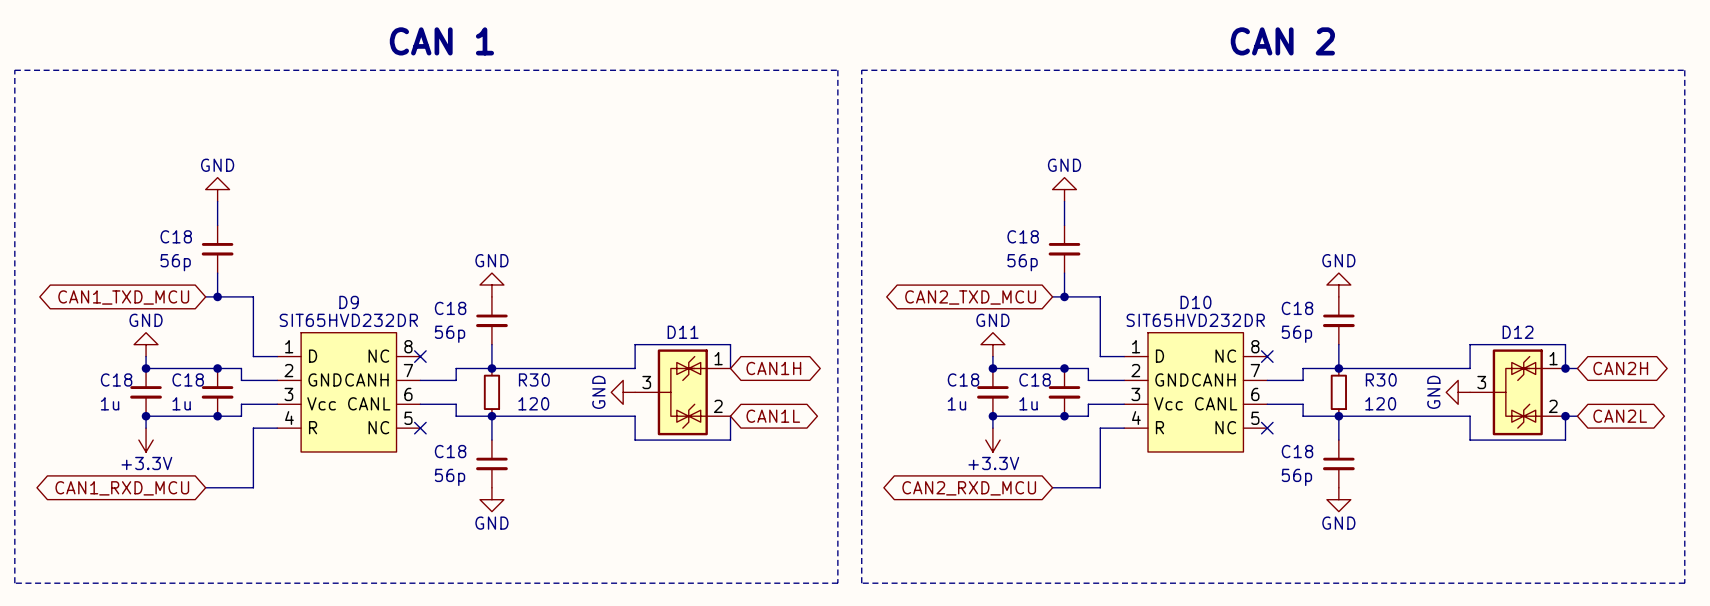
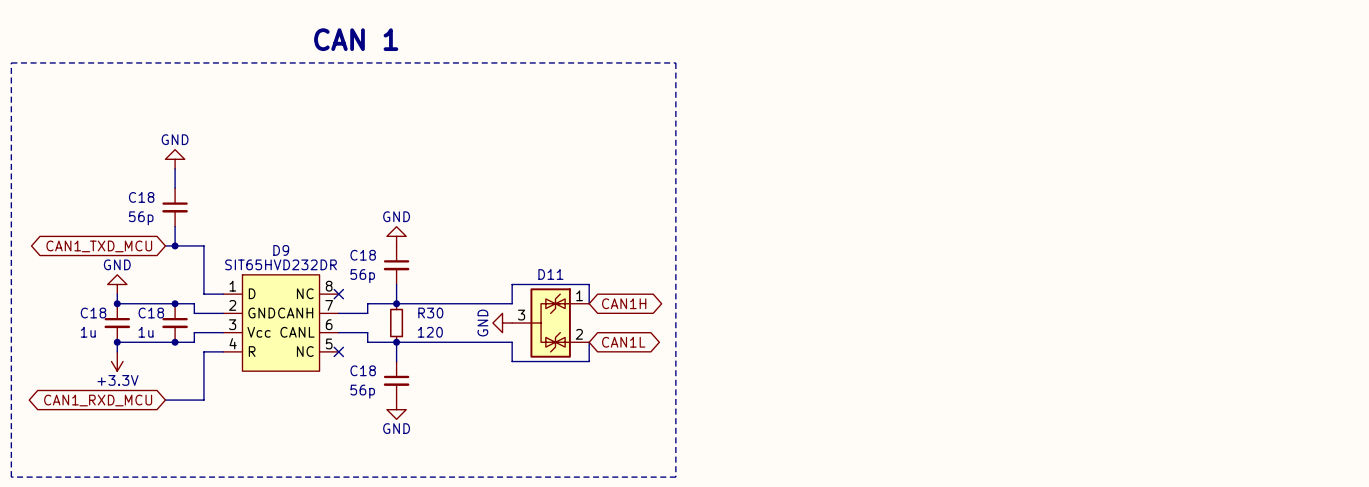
text: CAN 2 (1282, 41) -> none
line: (861, 70) (1684, 70) (1684, 583) (861, 583) (861, 70) -> none
power symbol: GND (1064, 189) -> none
wire: (1064, 201) (1064, 225) -> none
C18: 56p (1064, 249) -> none
wire: (1064, 273) (1064, 296) -> none
power symbol: GND (1338, 284) -> none
wire: (1052, 296) (1100, 296) (1100, 356) (1124, 356) -> none
junction: (1064, 296) -> none
global label: CAN2_TXD_MCU (970, 297) -> none
C18: 56p (1338, 320) -> none
power symbol: GND (992, 344) -> none
wire: (1338, 344) (1338, 368) -> none
wire: (992, 356) (992, 368) (1088, 368) (1088, 380) (1124, 380) -> none
no-connect mark: (1267, 356) -> none
junction: (992, 368) -> none
junction: (1064, 368) -> none
junction: (1338, 368) -> none
junction: (1565, 368) -> none
wire: (1577, 368) (1565, 368) (1565, 344) (1470, 344) (1470, 368) (1303, 368) (1303, 380) (1267, 380) -> none
global label: CAN2H (1620, 368) -> none
C18: 1u (992, 392) -> none
C18: 1u (1064, 392) -> none
D10: SIT65HVD232DR (1195, 392) -> none
R30: 120 (1338, 392) -> none
power symbol: GND (1458, 392) -> none
D12: (1517, 392) -> none
wire: (1124, 404) (1088, 404) (1088, 416) (992, 416) (992, 428) -> none
wire: (1267, 404) (1303, 404) (1303, 416) (1470, 416) (1470, 440) (1565, 440) (1565, 416) (1577, 416) -> none
junction: (992, 416) -> none
junction: (1064, 416) -> none
wire: (1338, 416) (1338, 440) -> none
junction: (1338, 416) -> none
junction: (1565, 416) -> none
global label: CAN2L (1620, 416) -> none
wire: (1124, 428) (1100, 428) (1100, 487) (1052, 487) -> none
no-connect mark: (1267, 428) -> none
power symbol: +3.3V (992, 440) -> none
C18: 56p (1338, 463) -> none
global label: CAN2_RXD_MCU (969, 488) -> none
power symbol: GND (1338, 499) -> none

